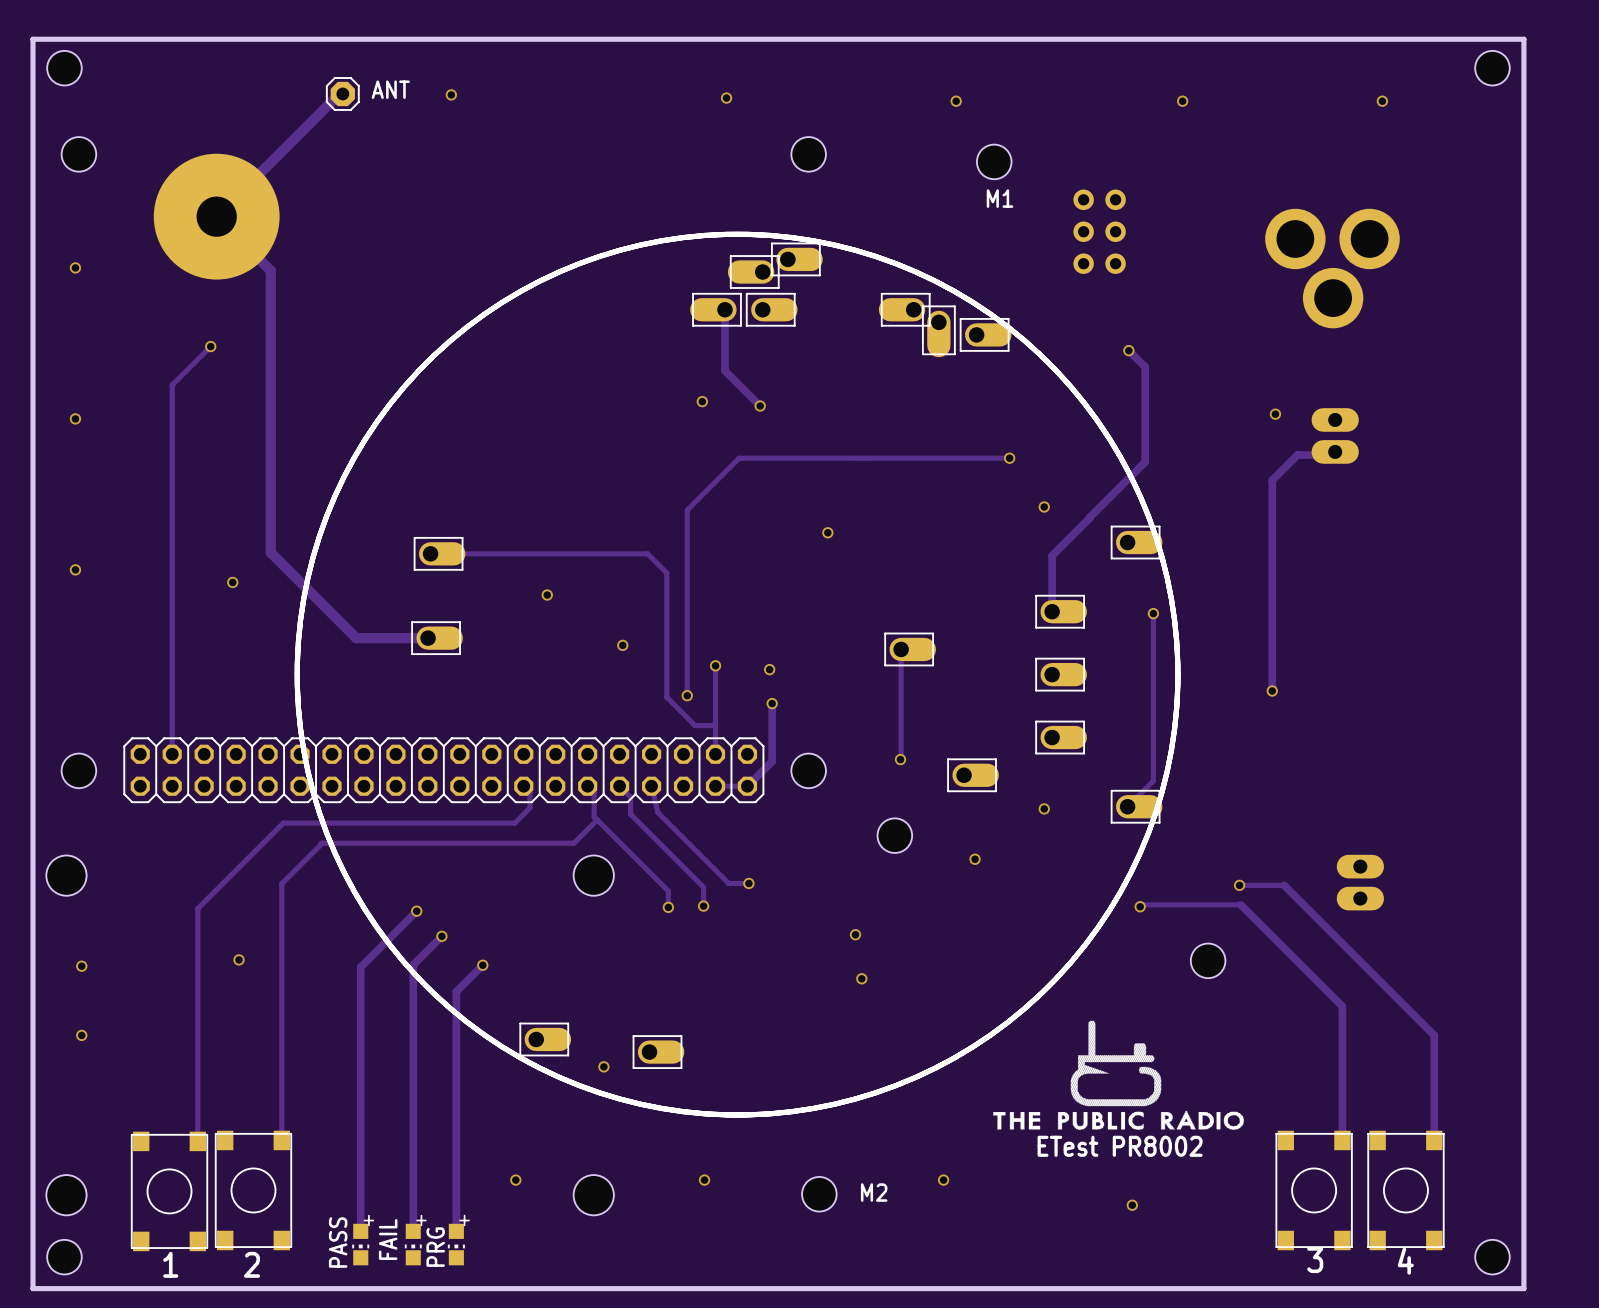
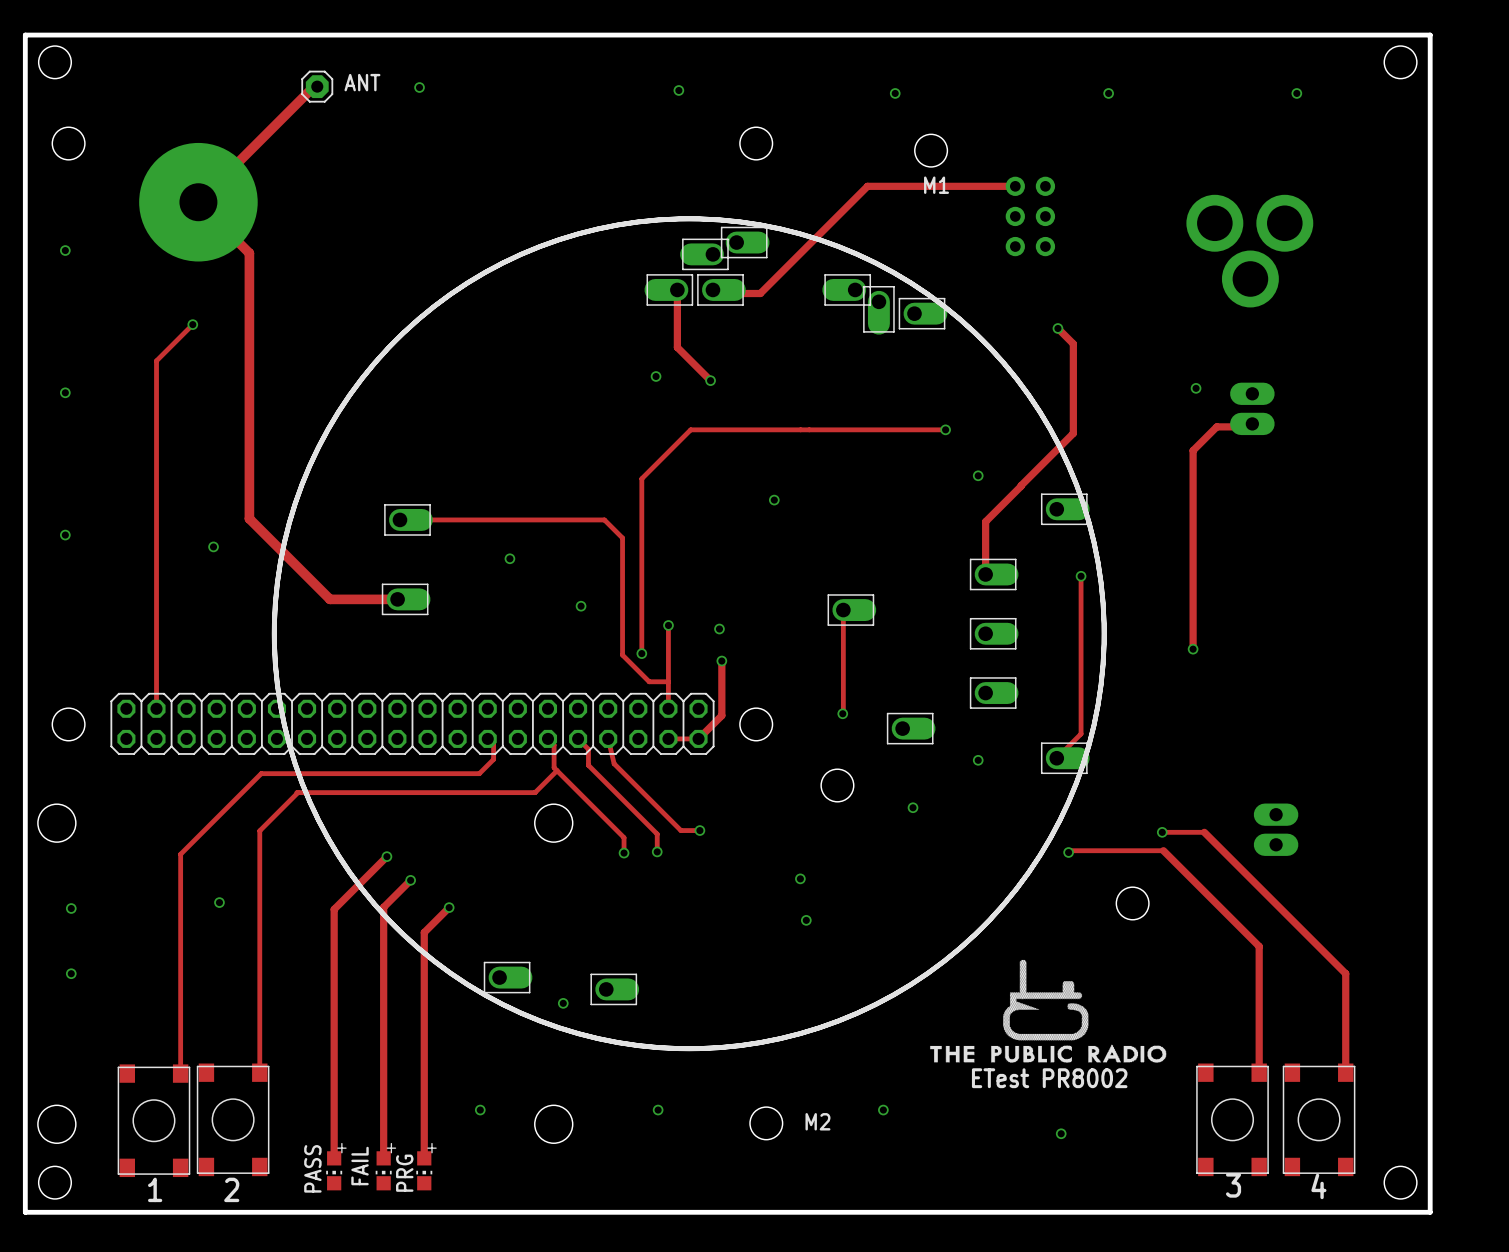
track: none -> (1015, 186) (867, 186) (760, 293) (716, 293) (712, 289)

